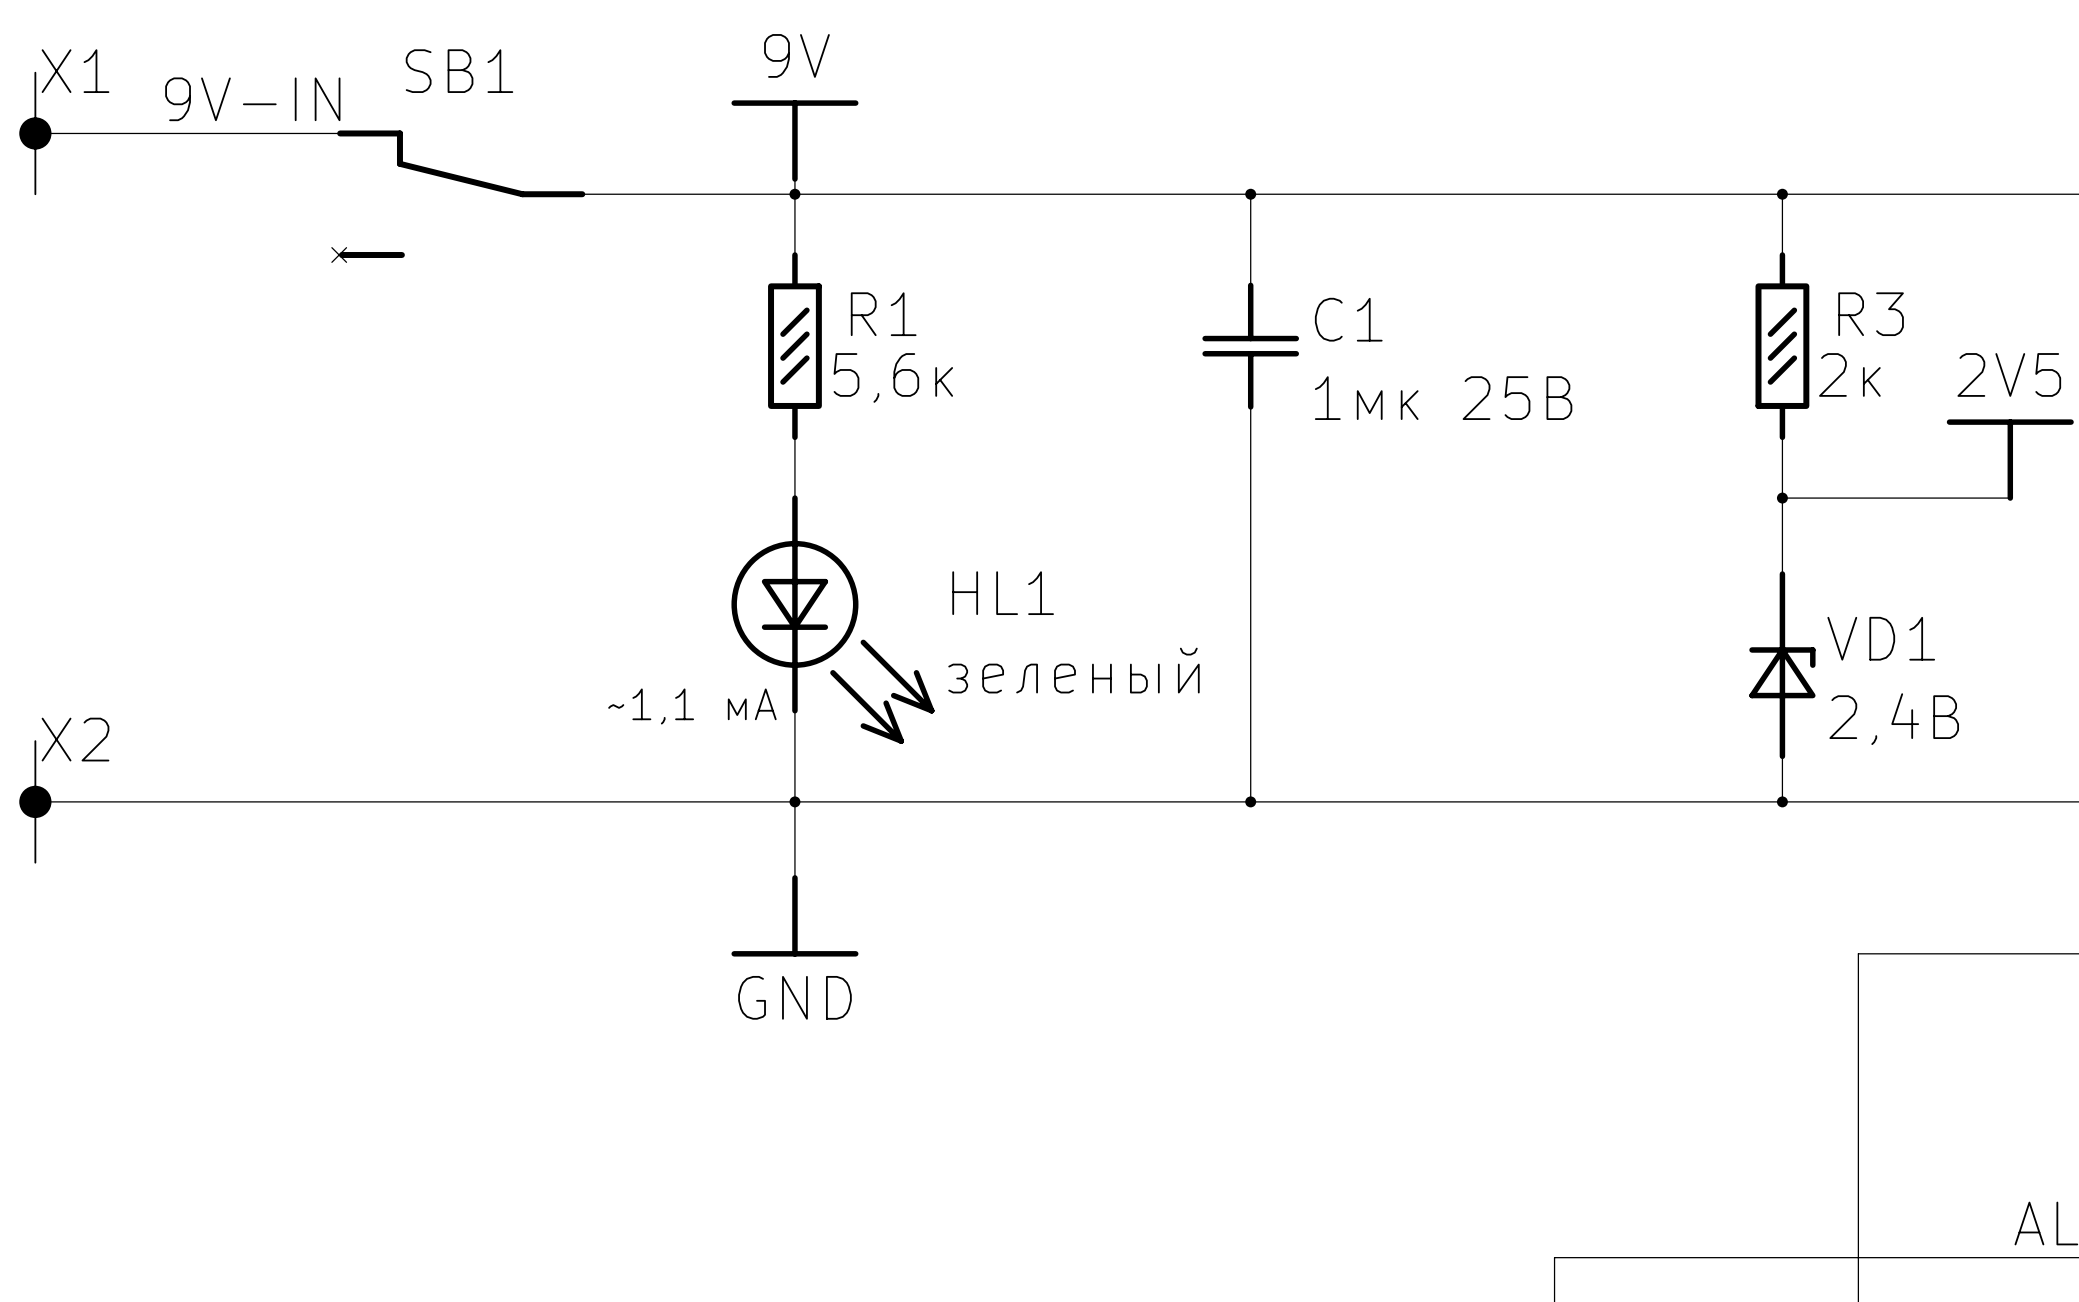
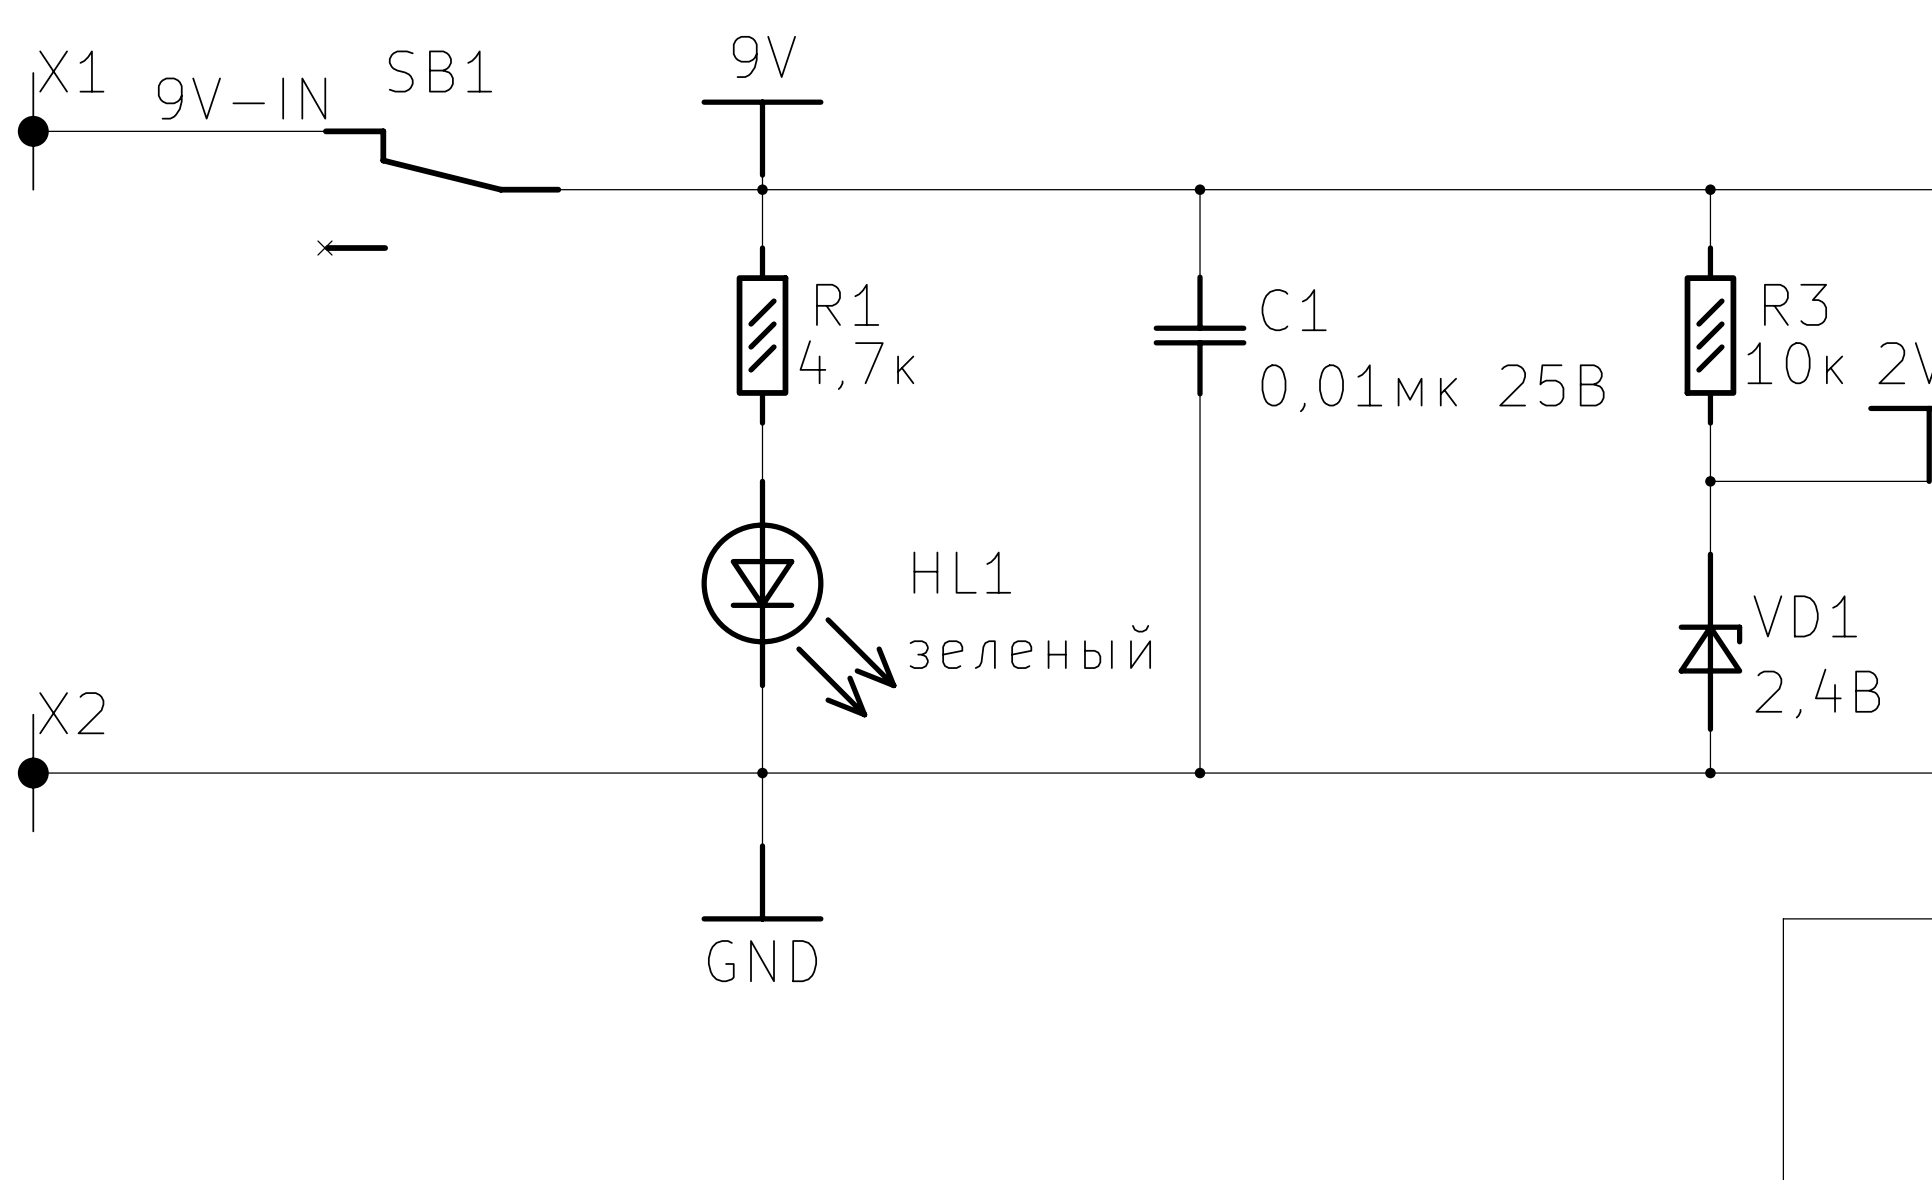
R3 text: 2к (1849, 374) -> 10к (1795, 363)
R1 text: 5,6к (893, 377) -> 4,7к (856, 365)
C1 text: 1мк 25В (1443, 398) -> 0,01мк 25В (1433, 388)
text: ~1,1 мА (692, 706) -> none

